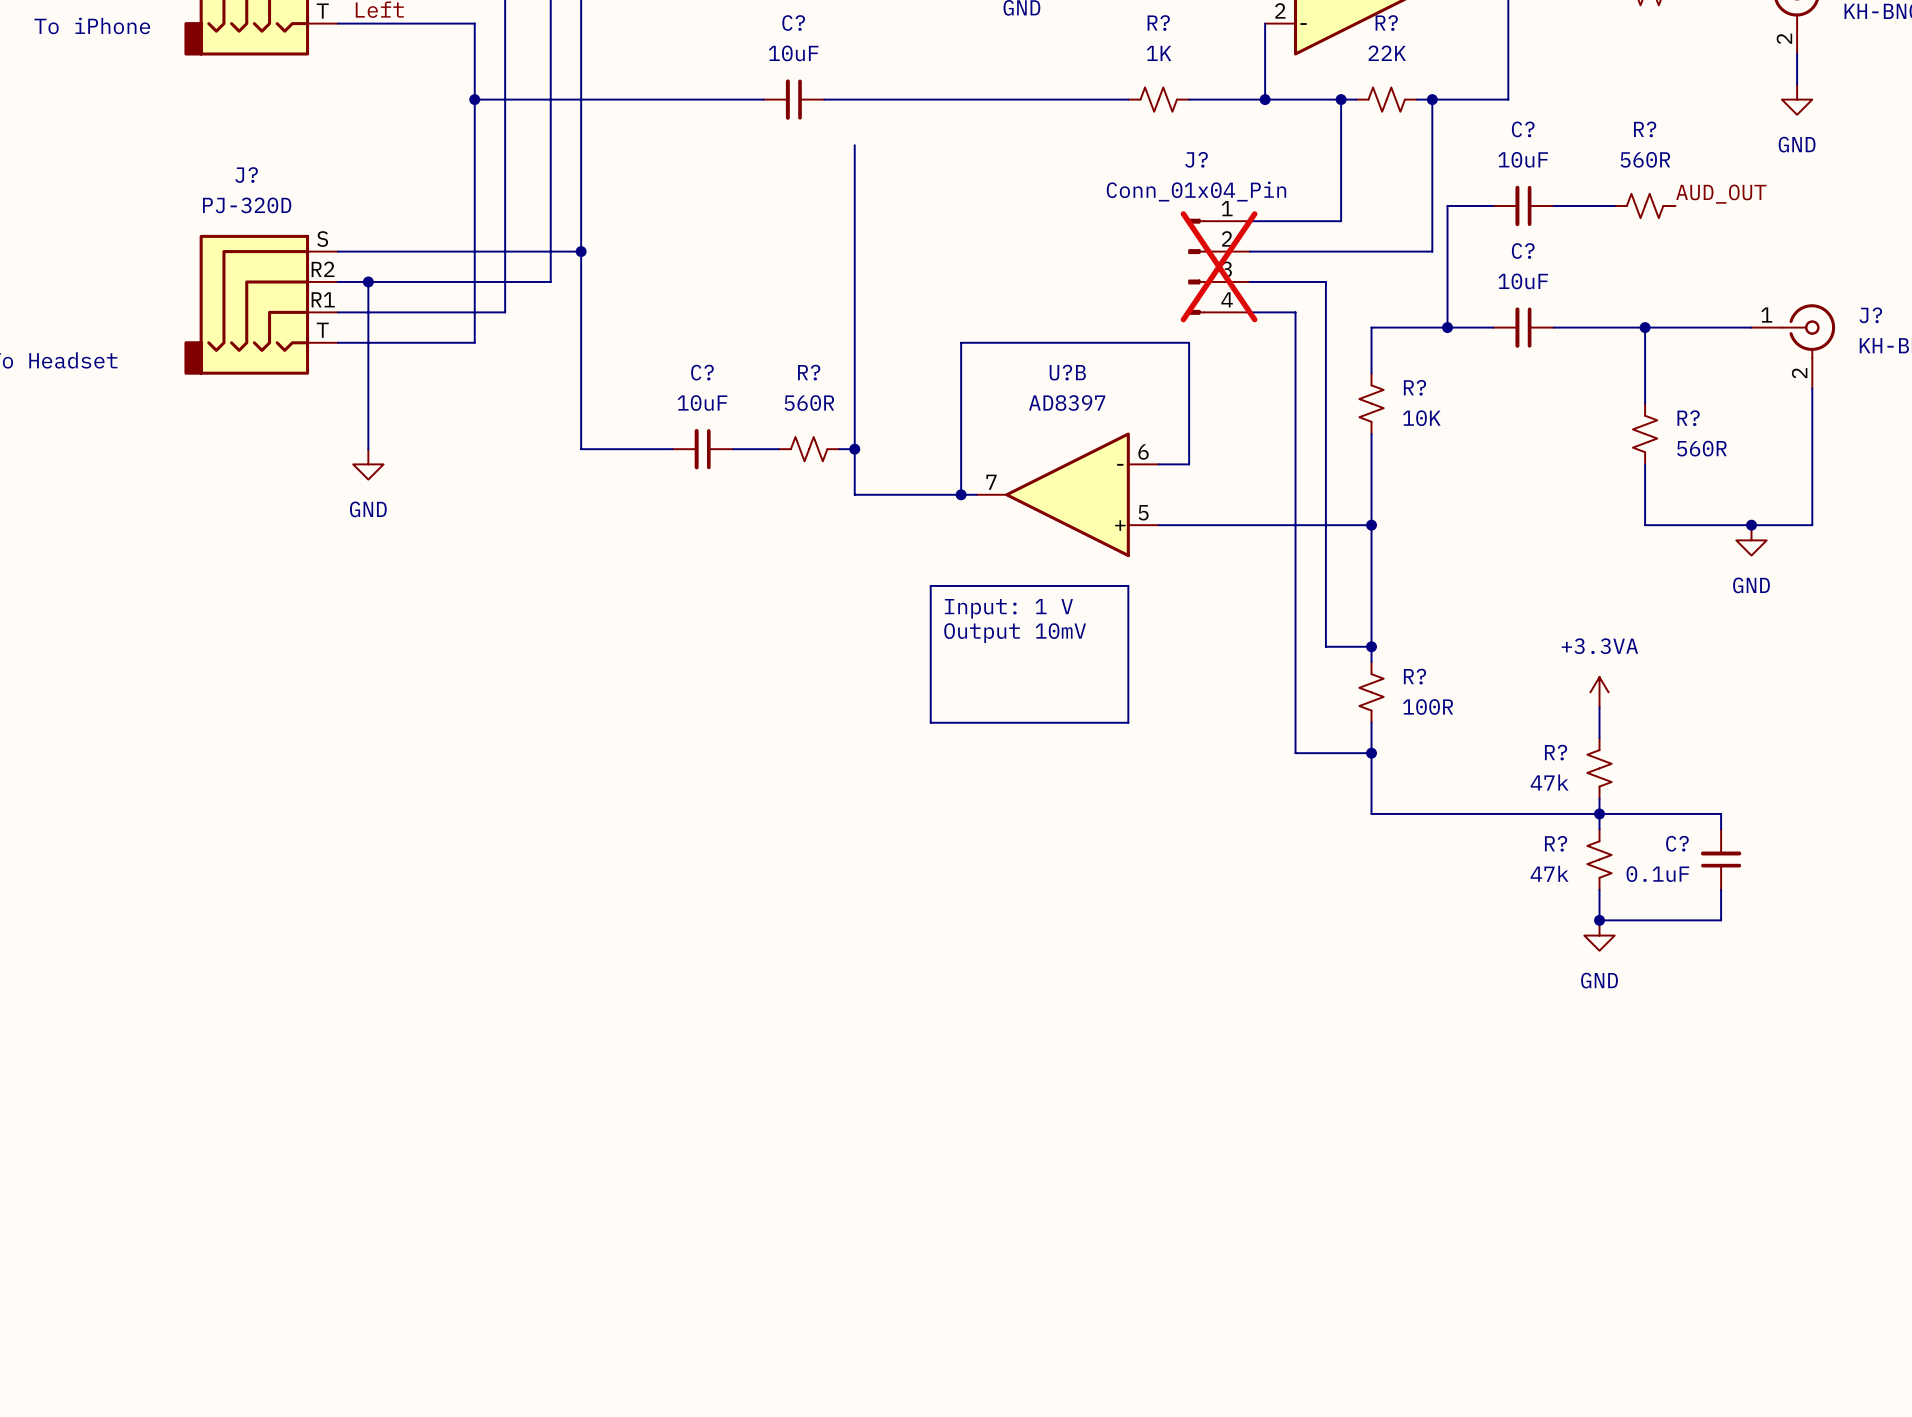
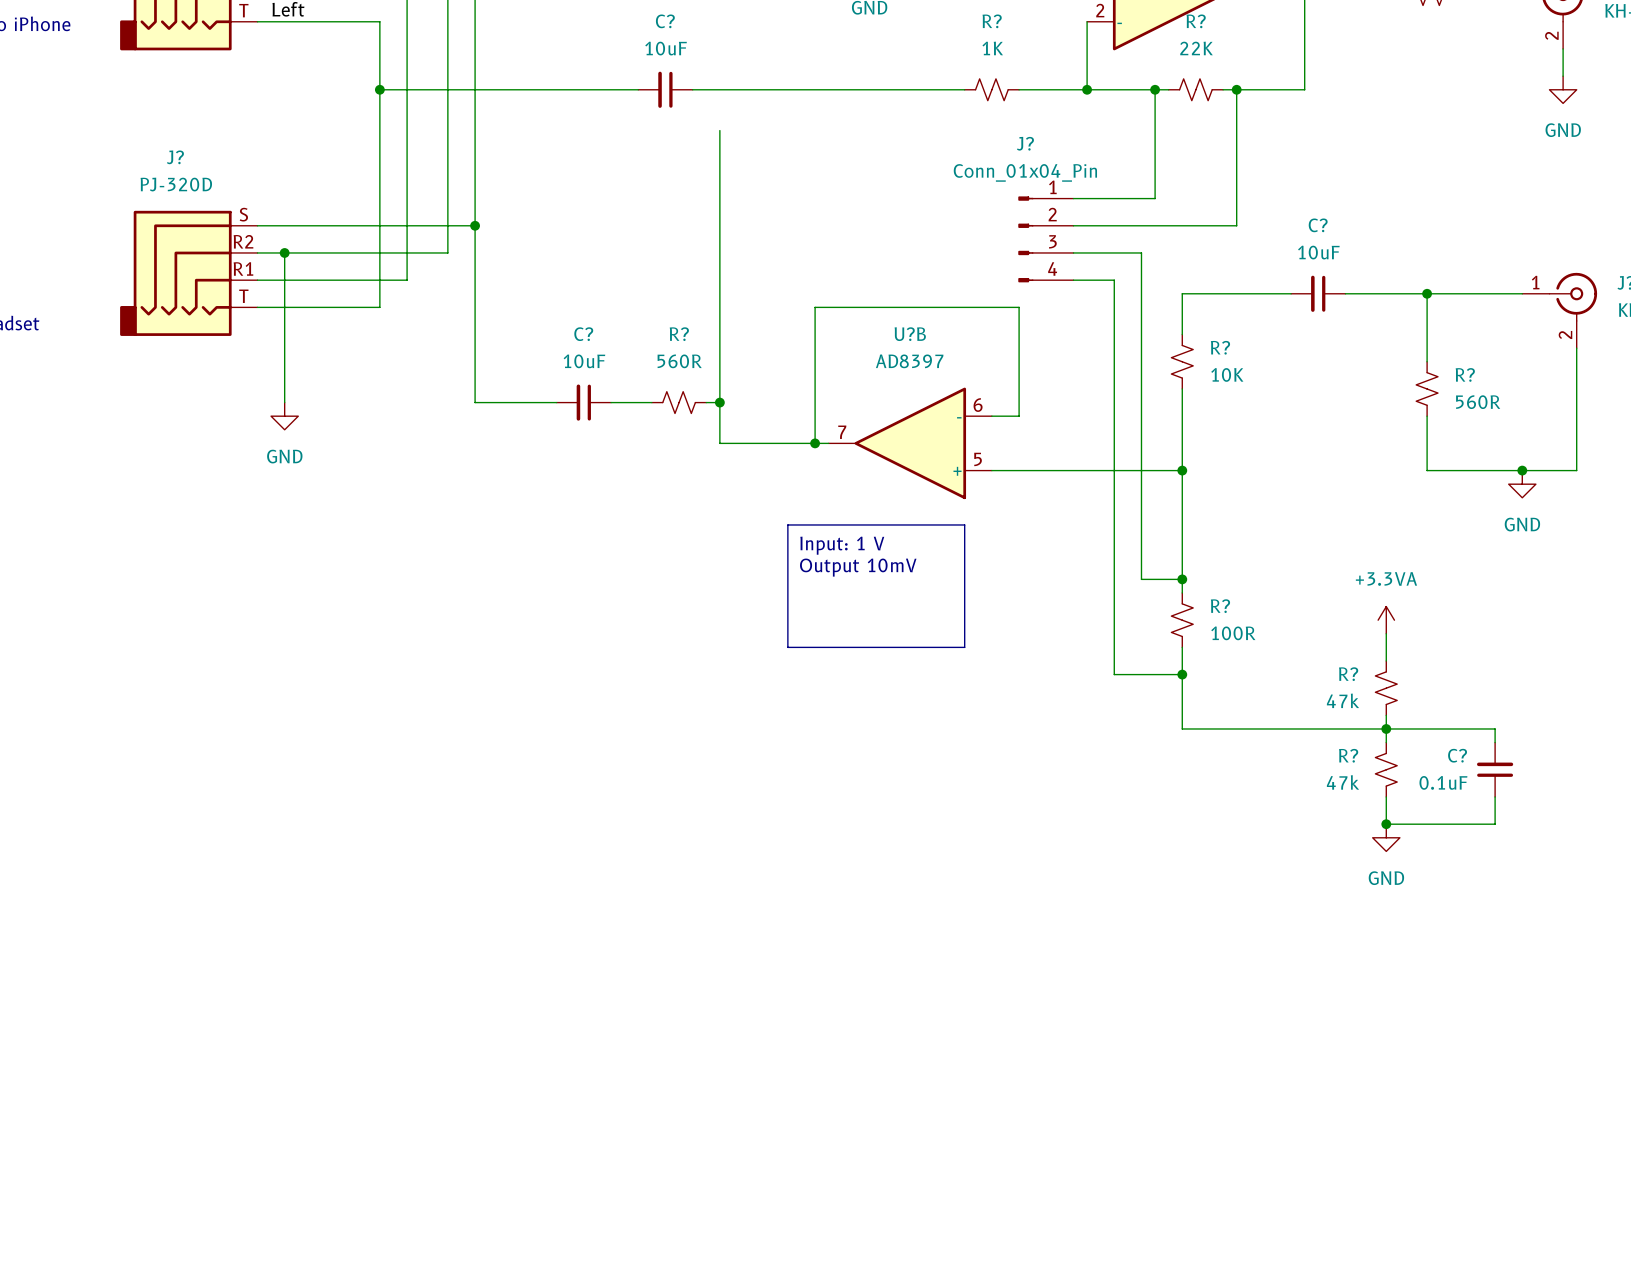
label: AUD_OUT (1721, 194) -> none
wire: (1493, 205) (1447, 205) (1447, 327) -> none
C?: 10uF (1523, 205) -> none
wire: (1553, 205) (1614, 205) -> none
R?: 560R (1645, 205) -> none
J? do-not-place cross: (1219, 266) -> none
junction: (1447, 327) -> none

